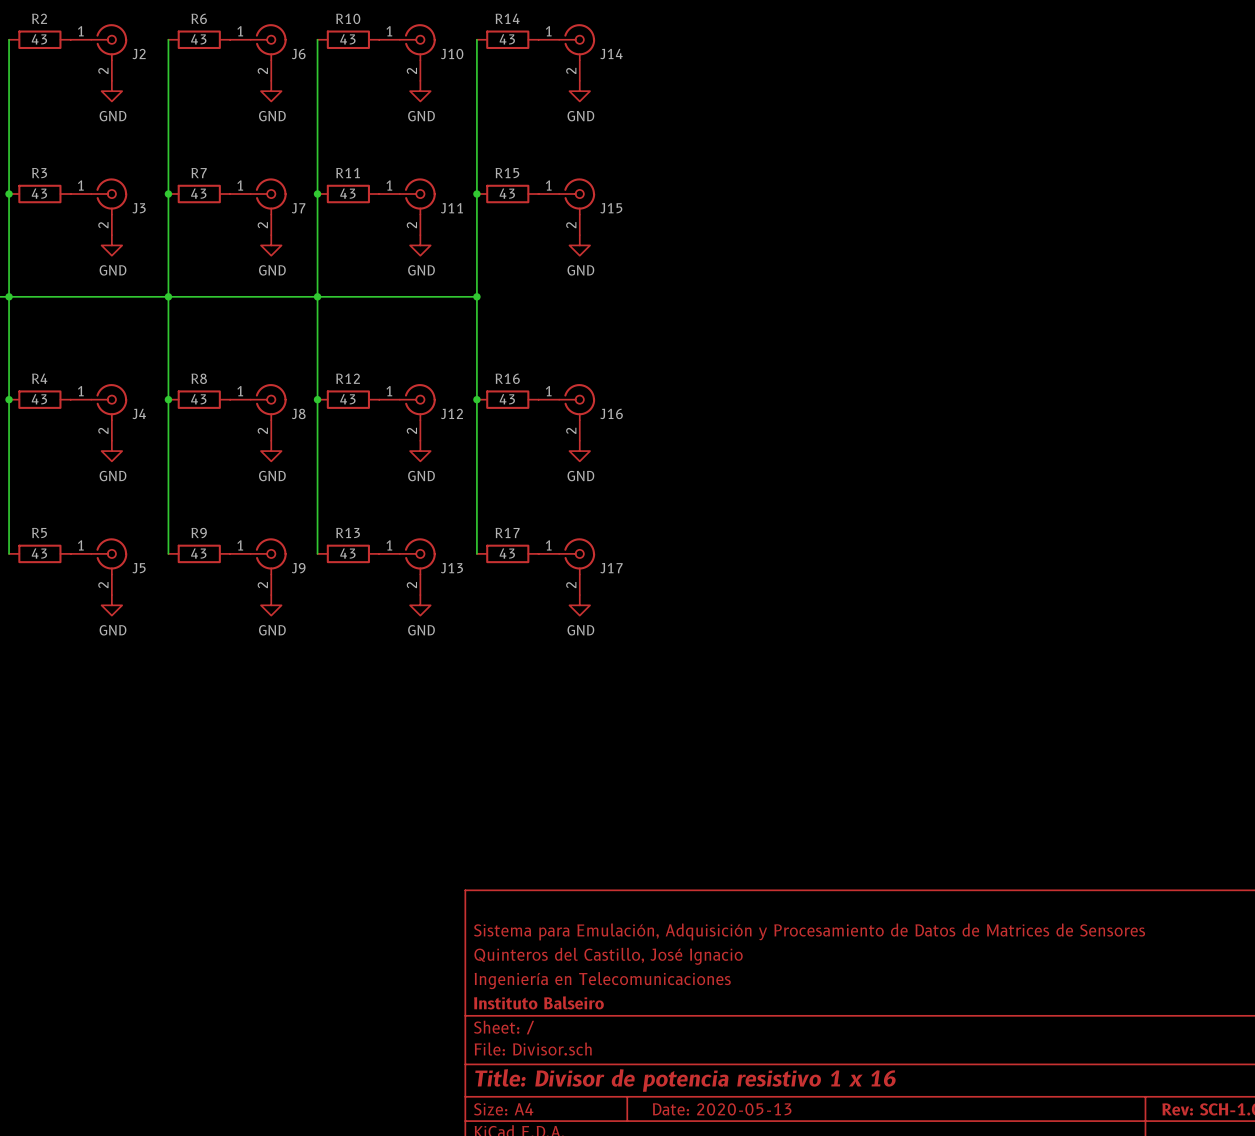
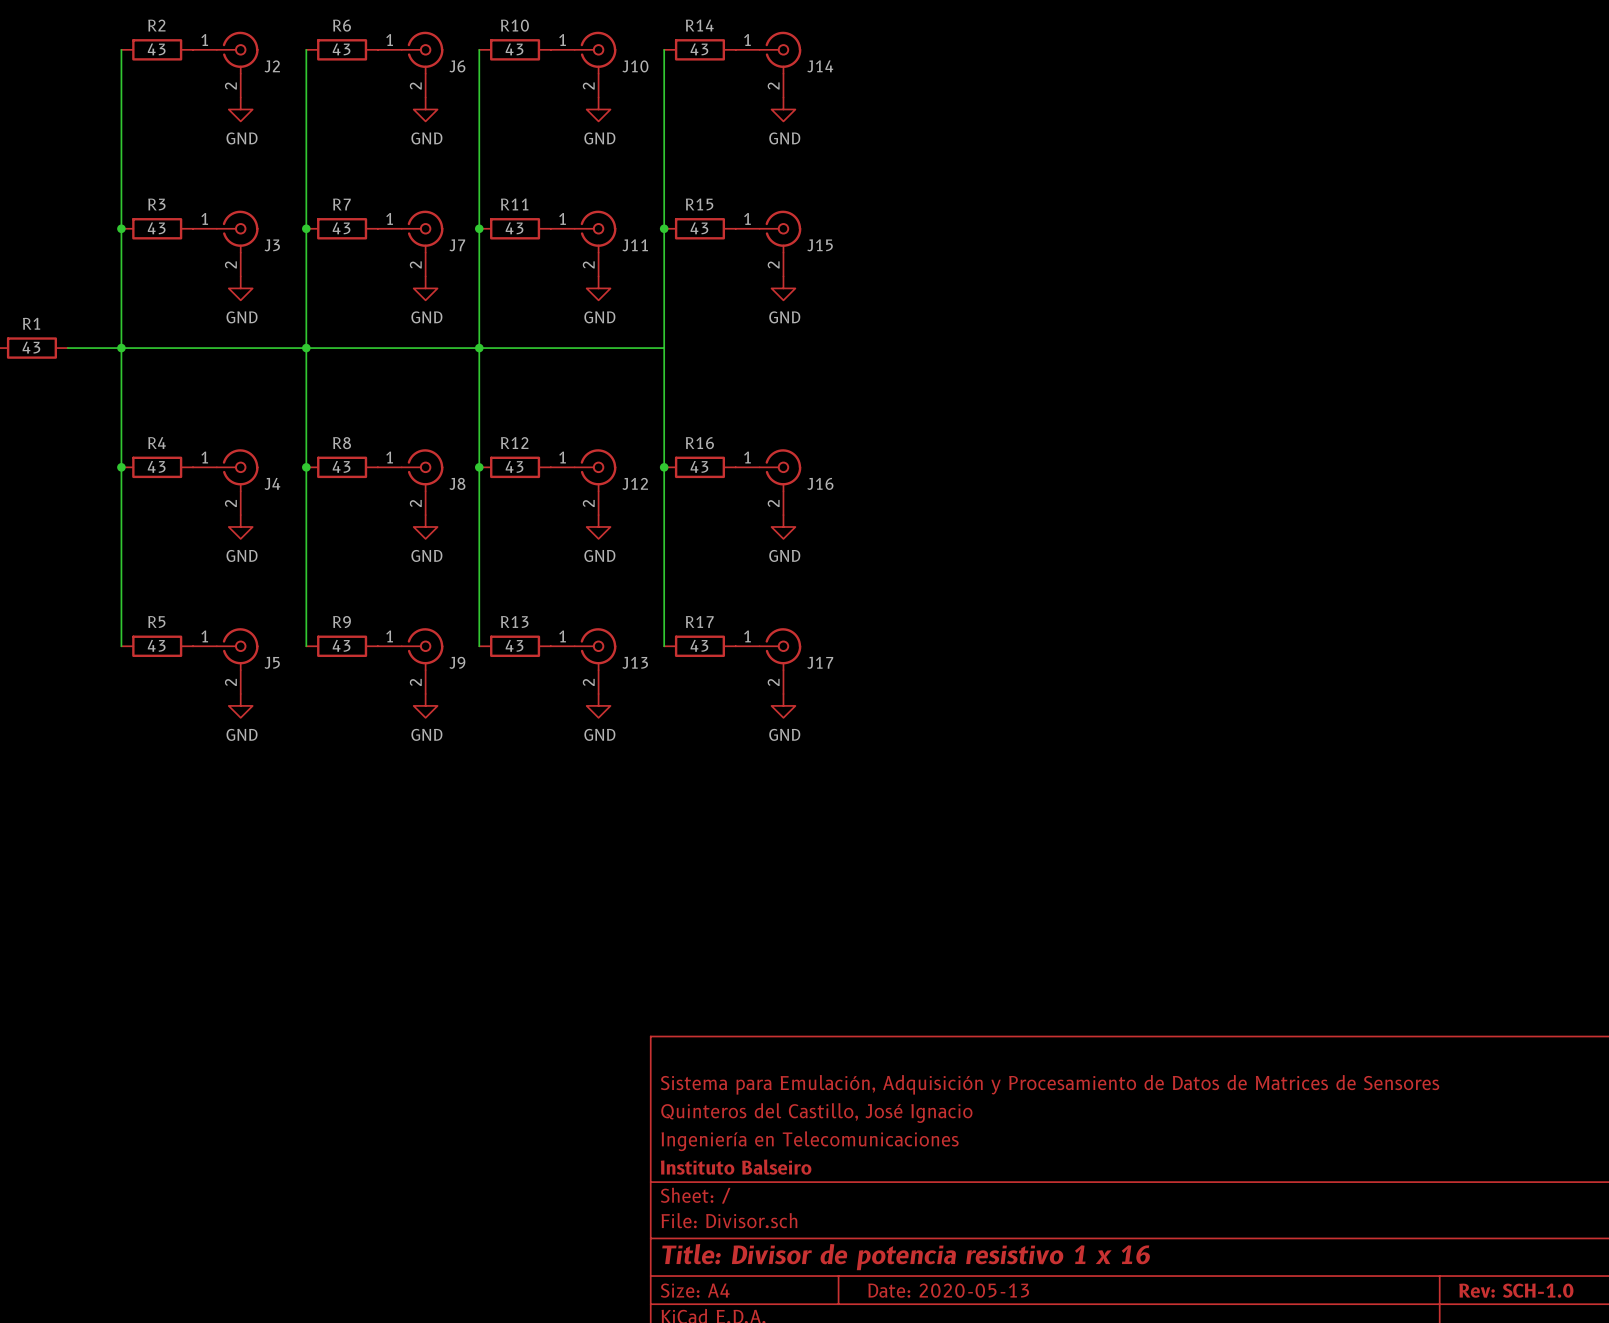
junction: (476, 296) -> none

